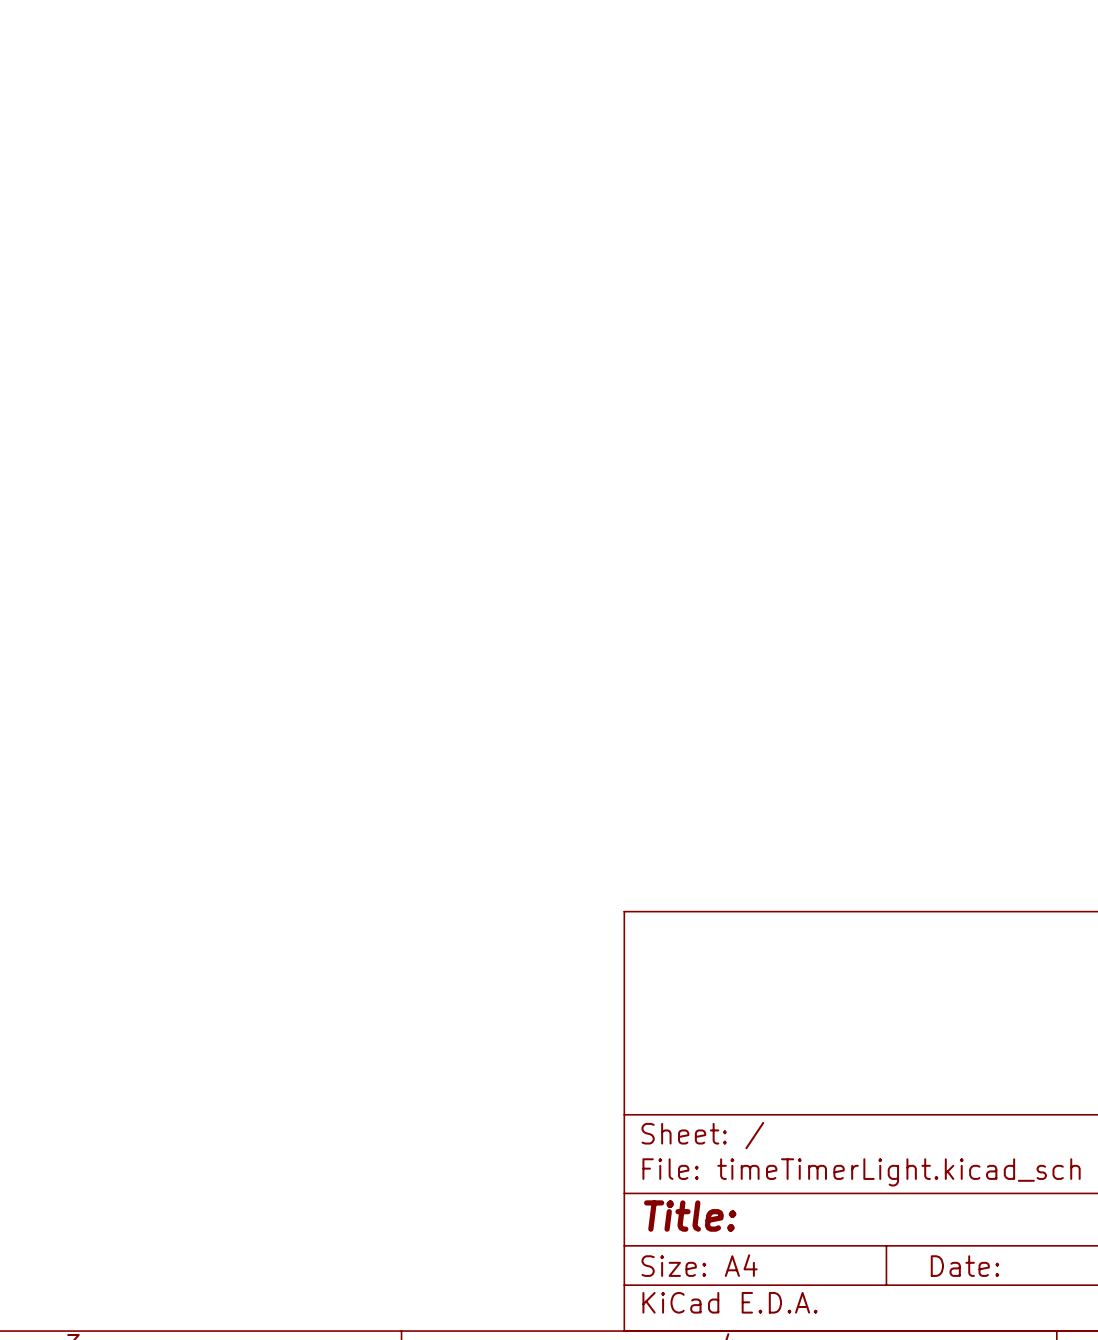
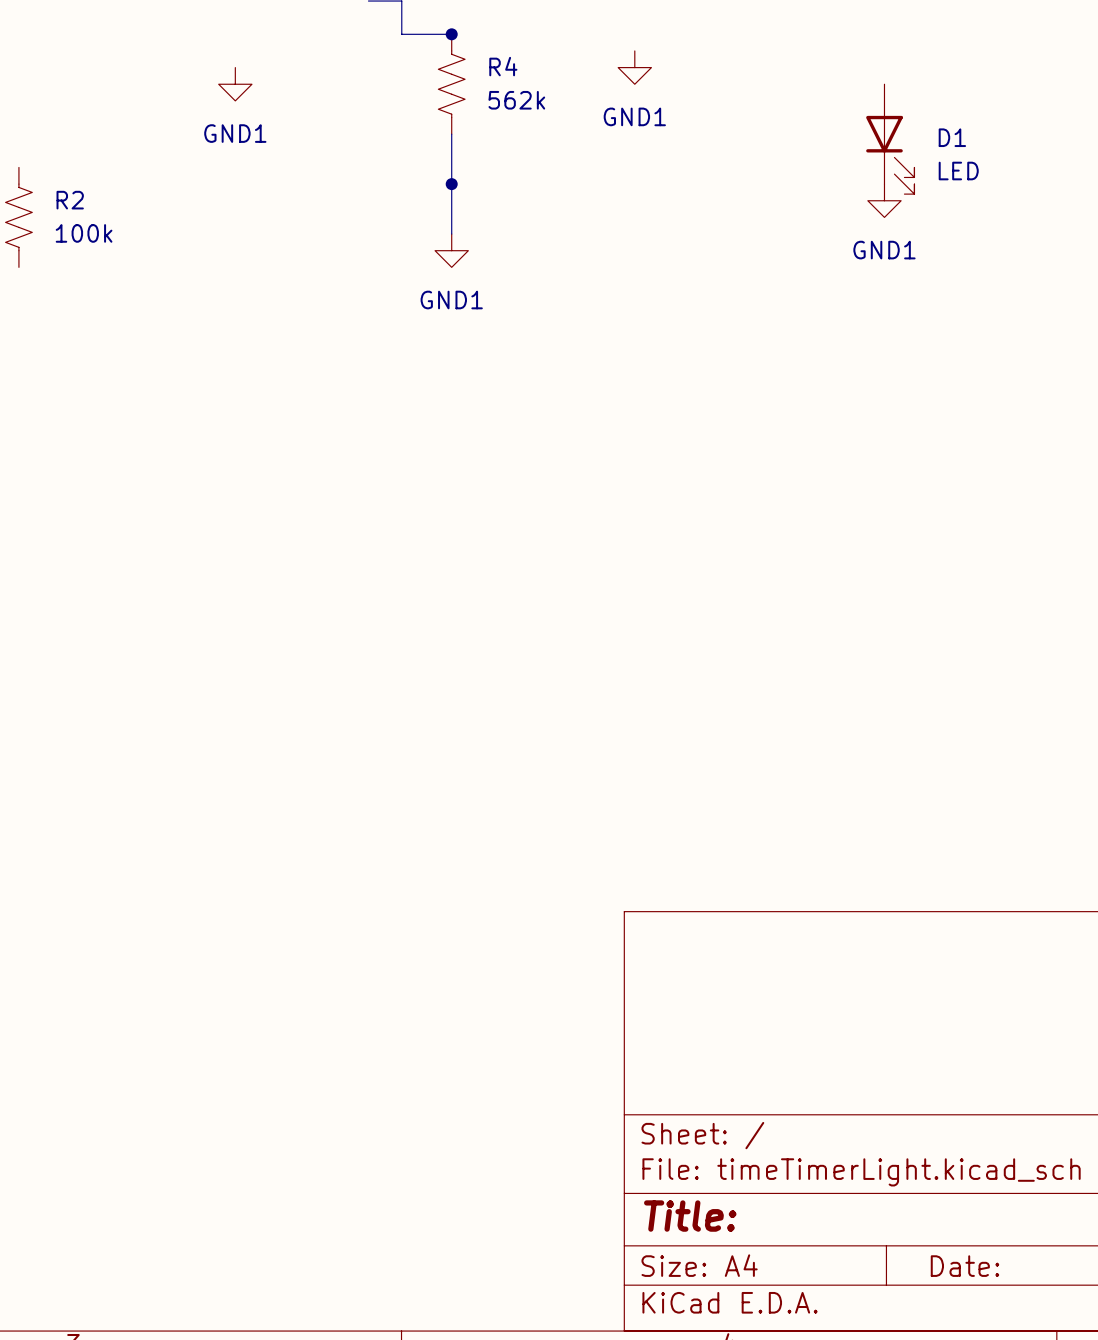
wire: none -> (368, 1) (401, 1) (401, 34) (451, 34)
junction: none -> (451, 34)
power symbol: none -> GND1 (634, 67)
power symbol: none -> GND1 (235, 84)
R4: none -> 562k (451, 84)
wire: none -> (451, 134) (451, 234)
D1: none -> LED (890, 139)
junction: none -> (451, 184)
power symbol: none -> GND1 (884, 200)
R2: none -> 100k (18, 217)
power symbol: none -> GND1 (451, 250)

